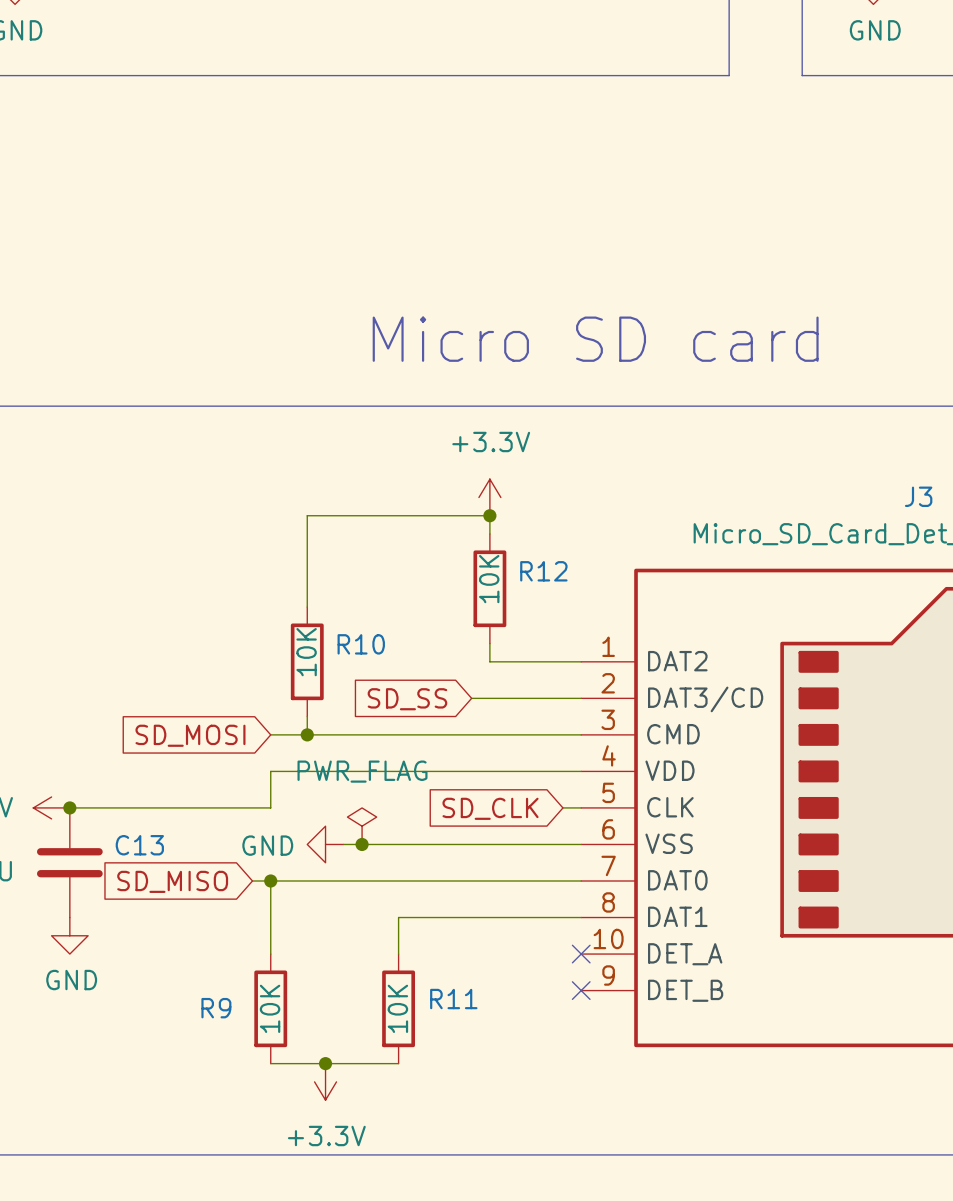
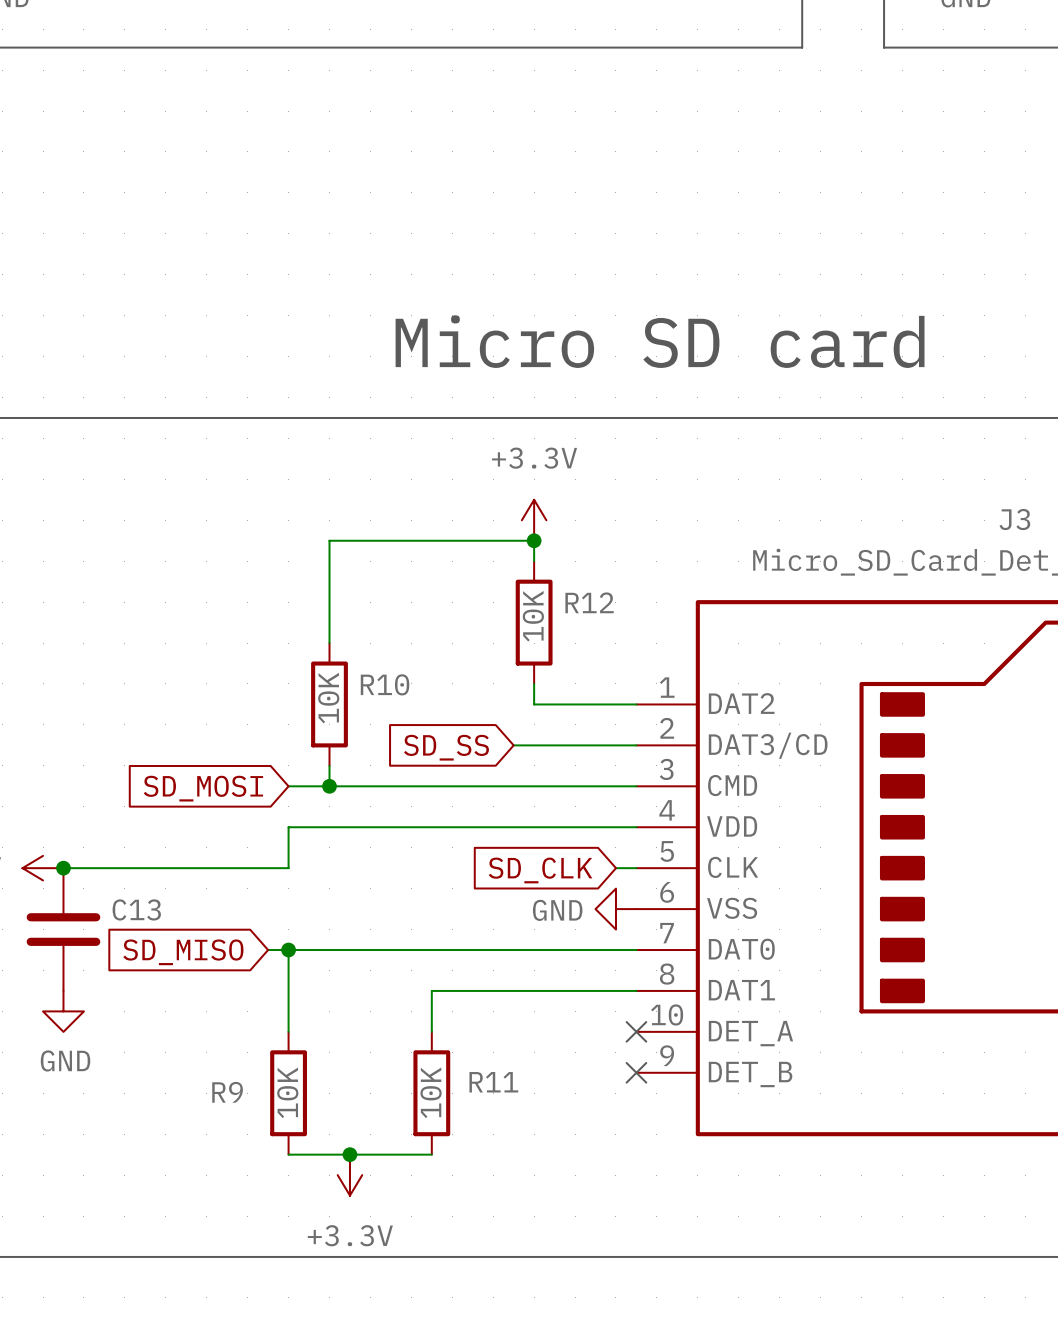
power symbol: PWR_FLAG (362, 826) -> none
power symbol position: GND (325, 844) -> GND (615, 909)
wire: (343, 844) (581, 844) -> none
junction: (362, 844) -> none

